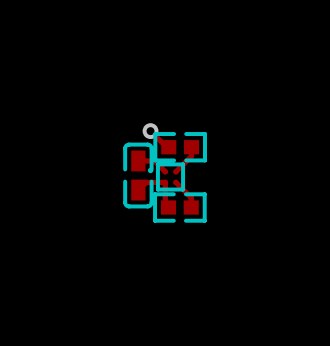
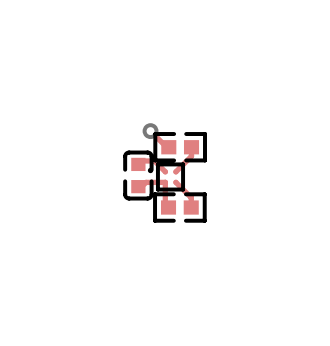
part footprint: [123, 142, 154, 209] -> [123, 150, 154, 201]

